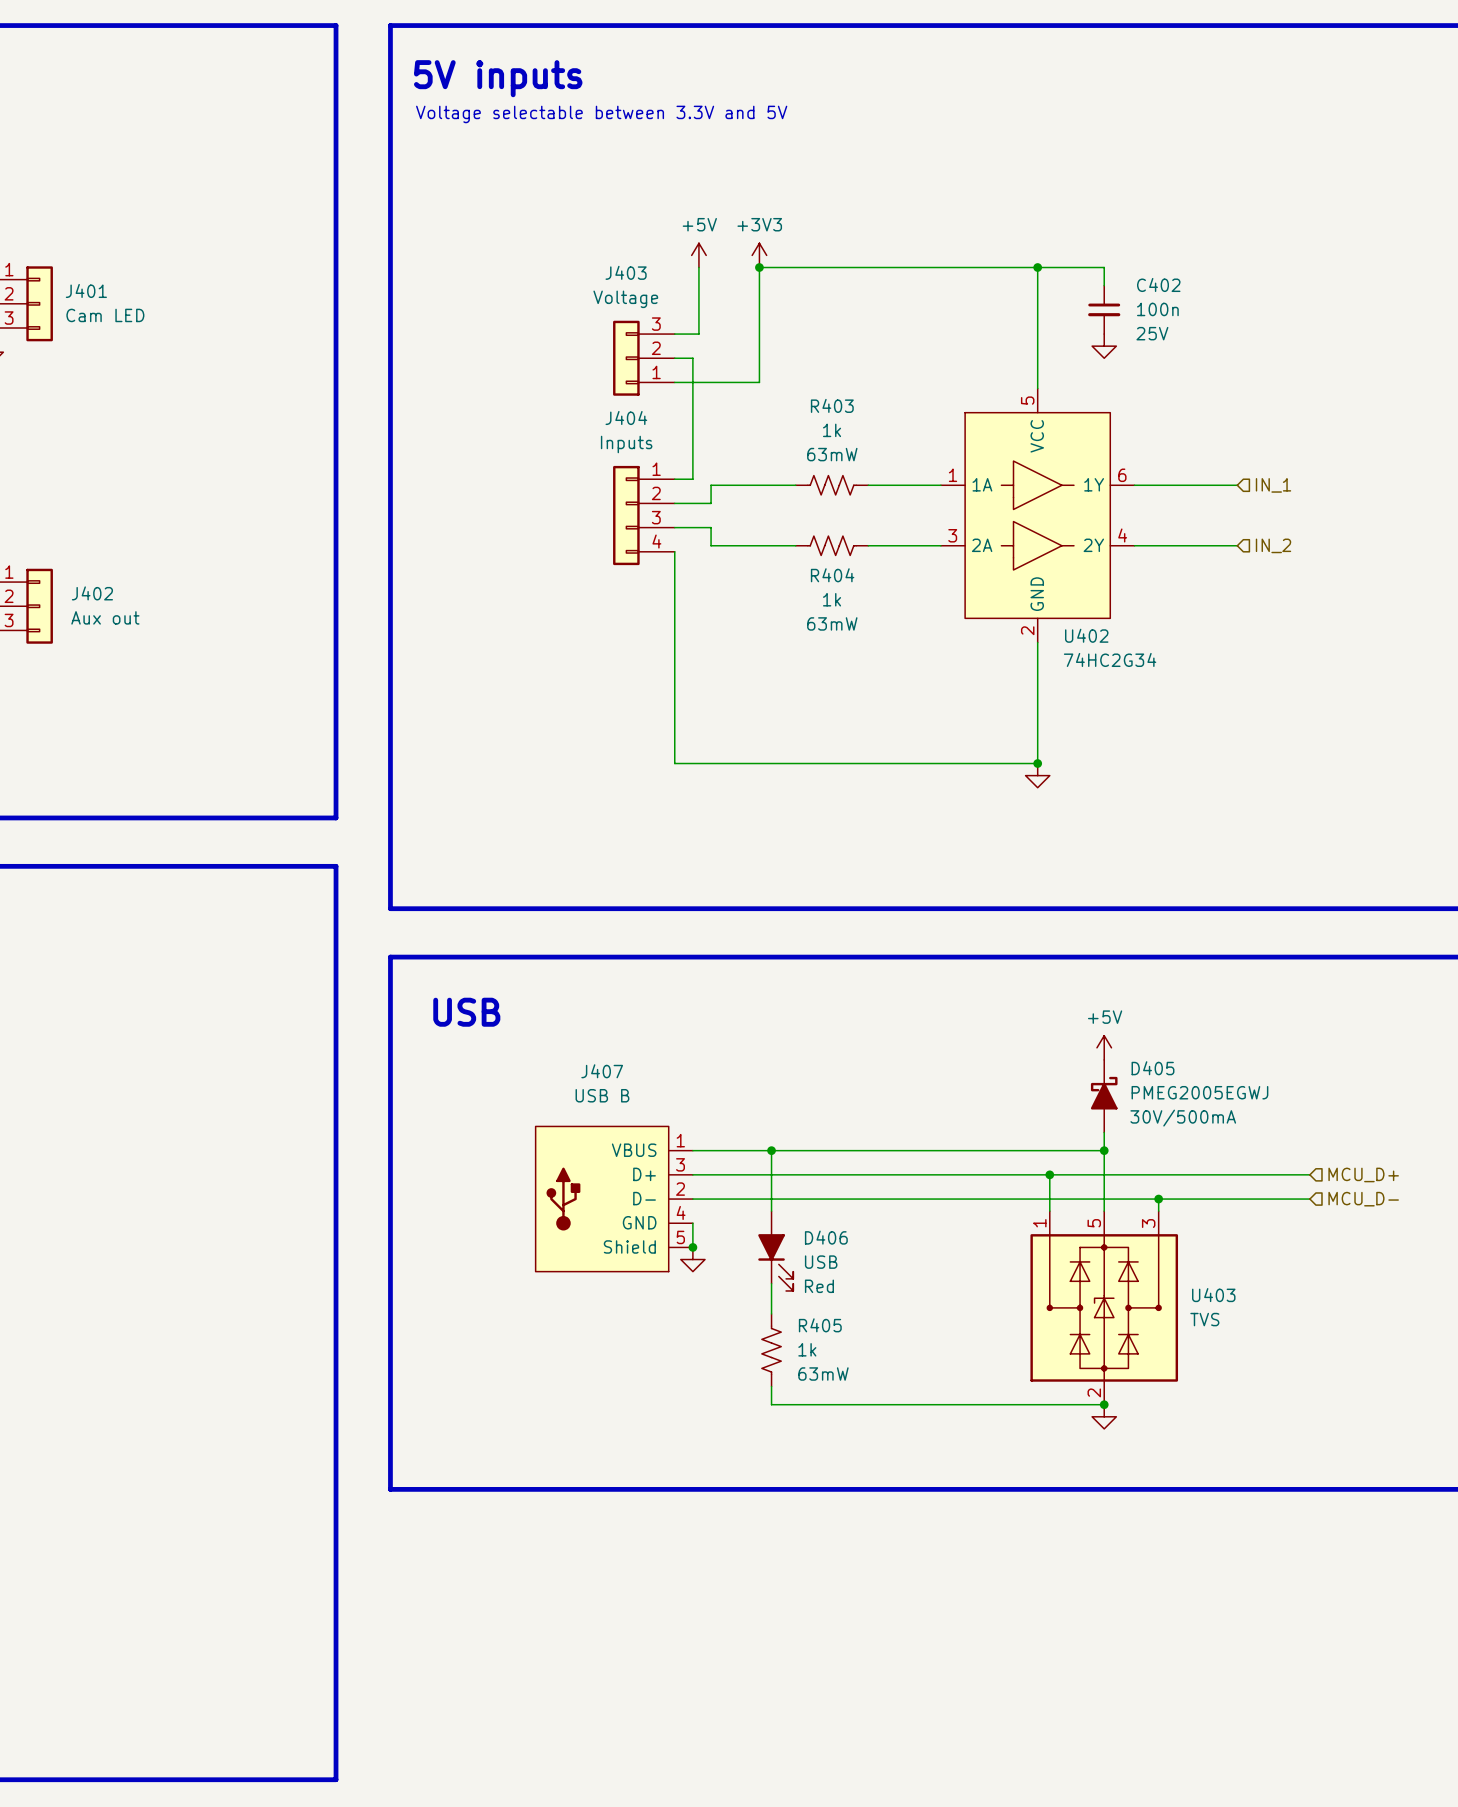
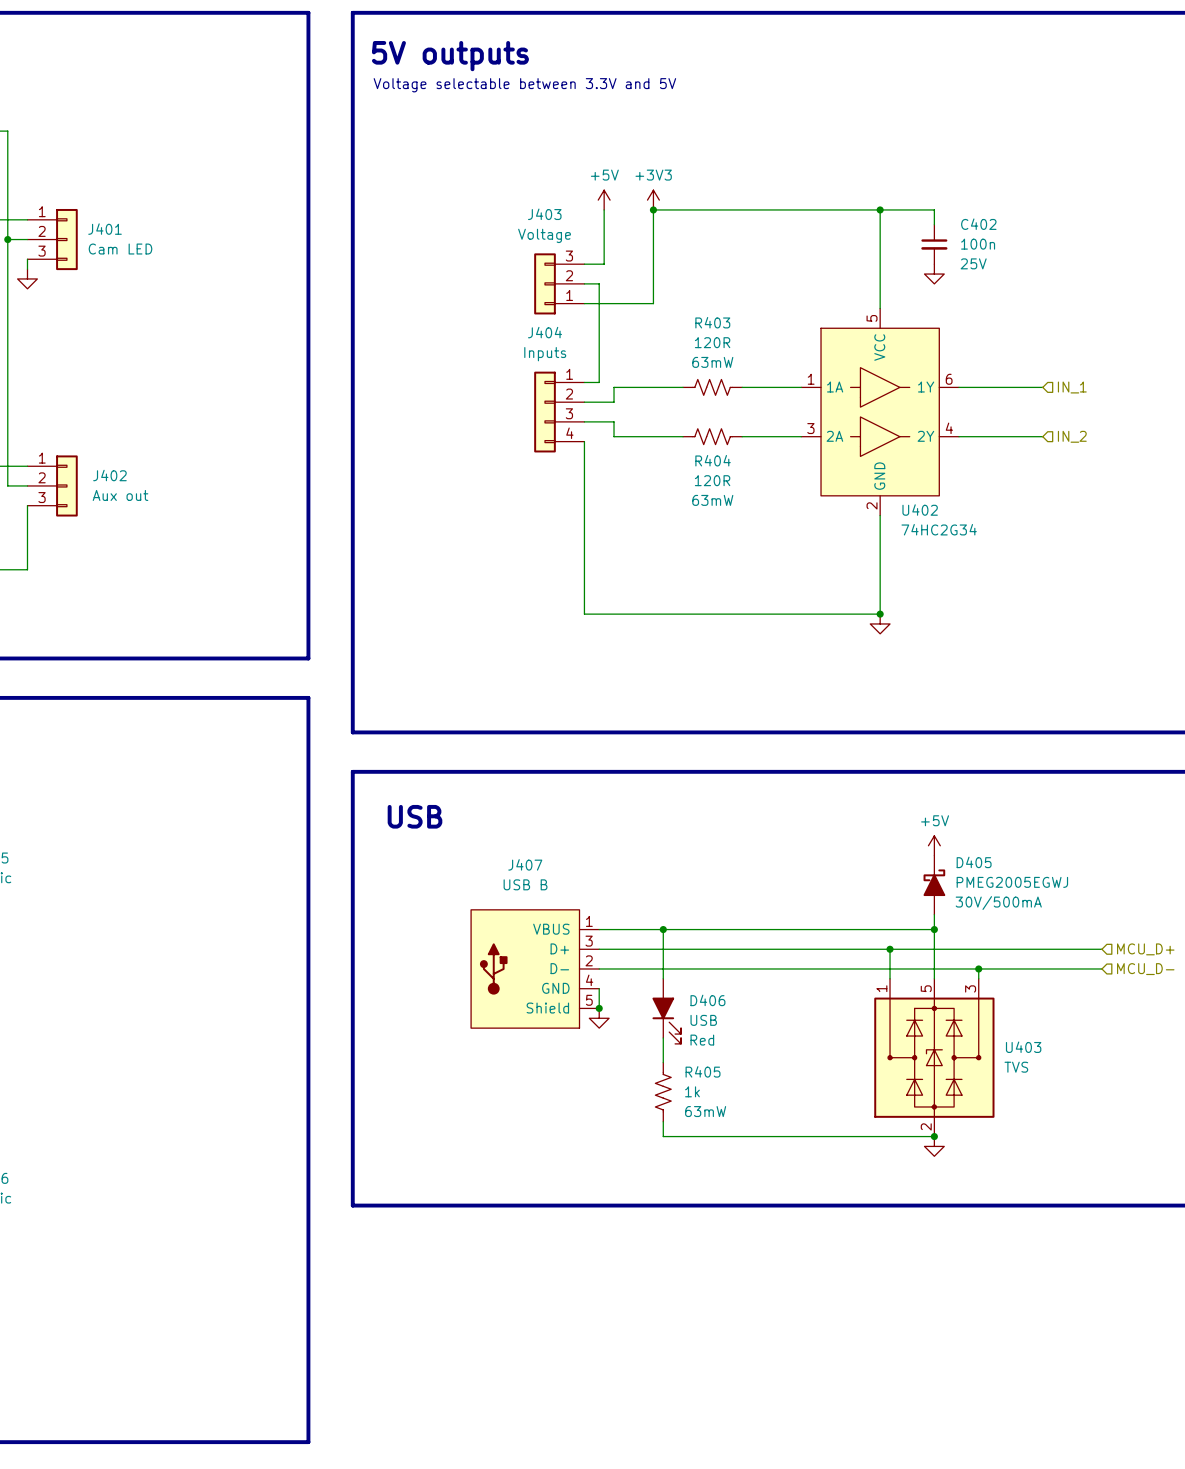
text: 5V inputs (498, 78) -> 5V outputs (450, 56)
R403 value: 1k (832, 430) -> 120R (712, 342)
R404 value: 1k (832, 599) -> 120R (712, 480)

